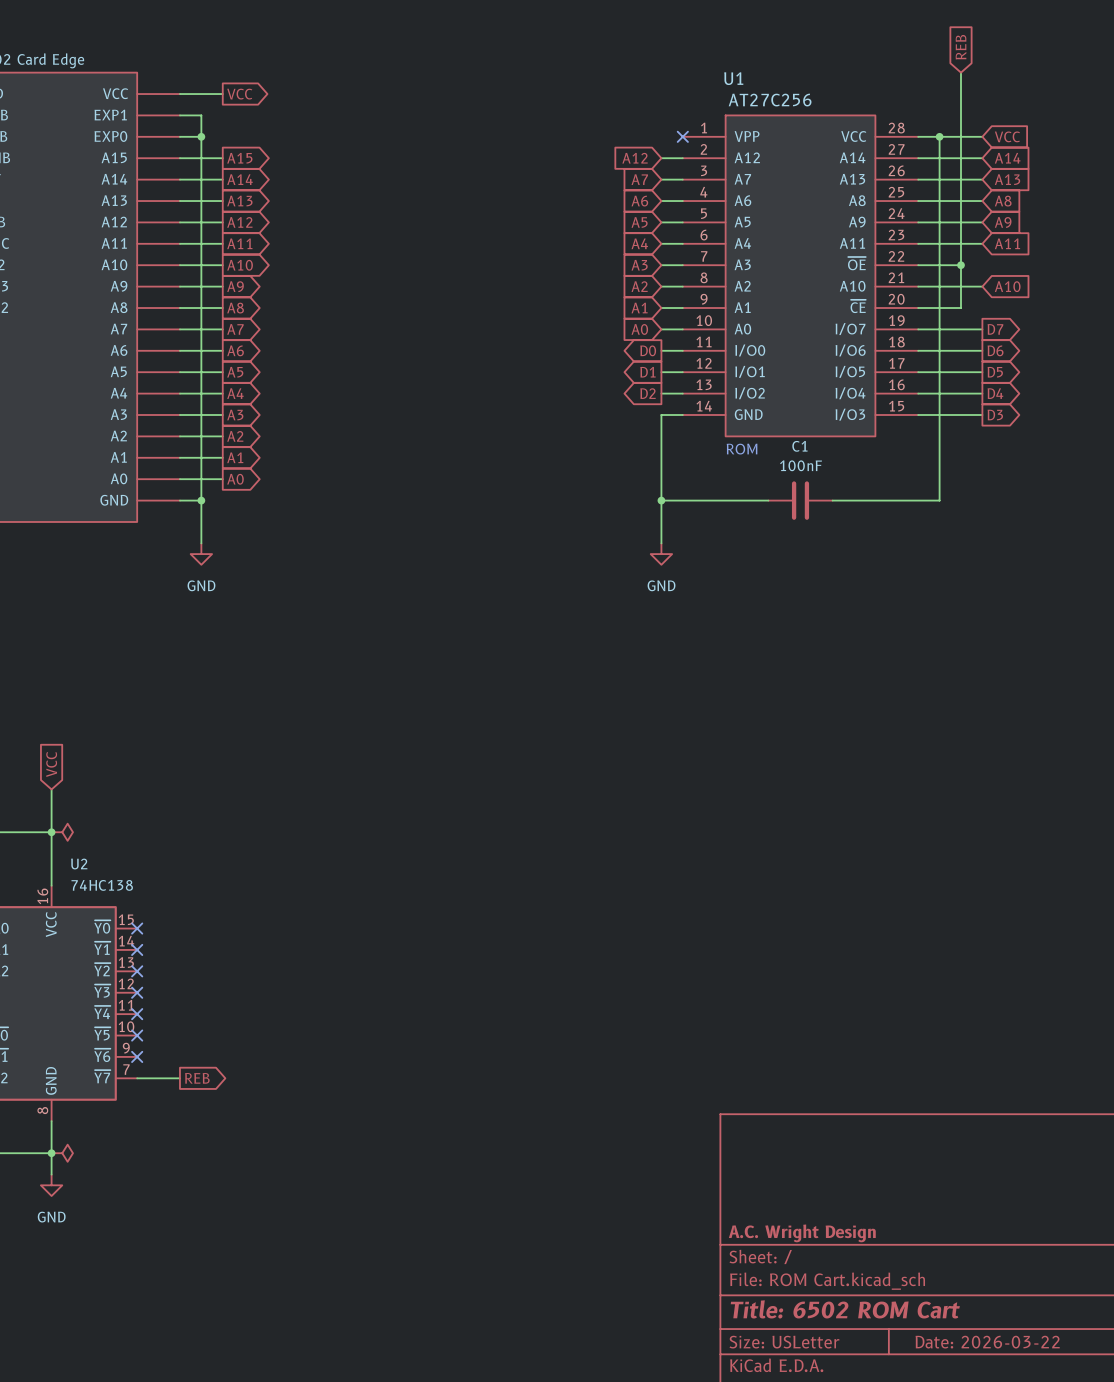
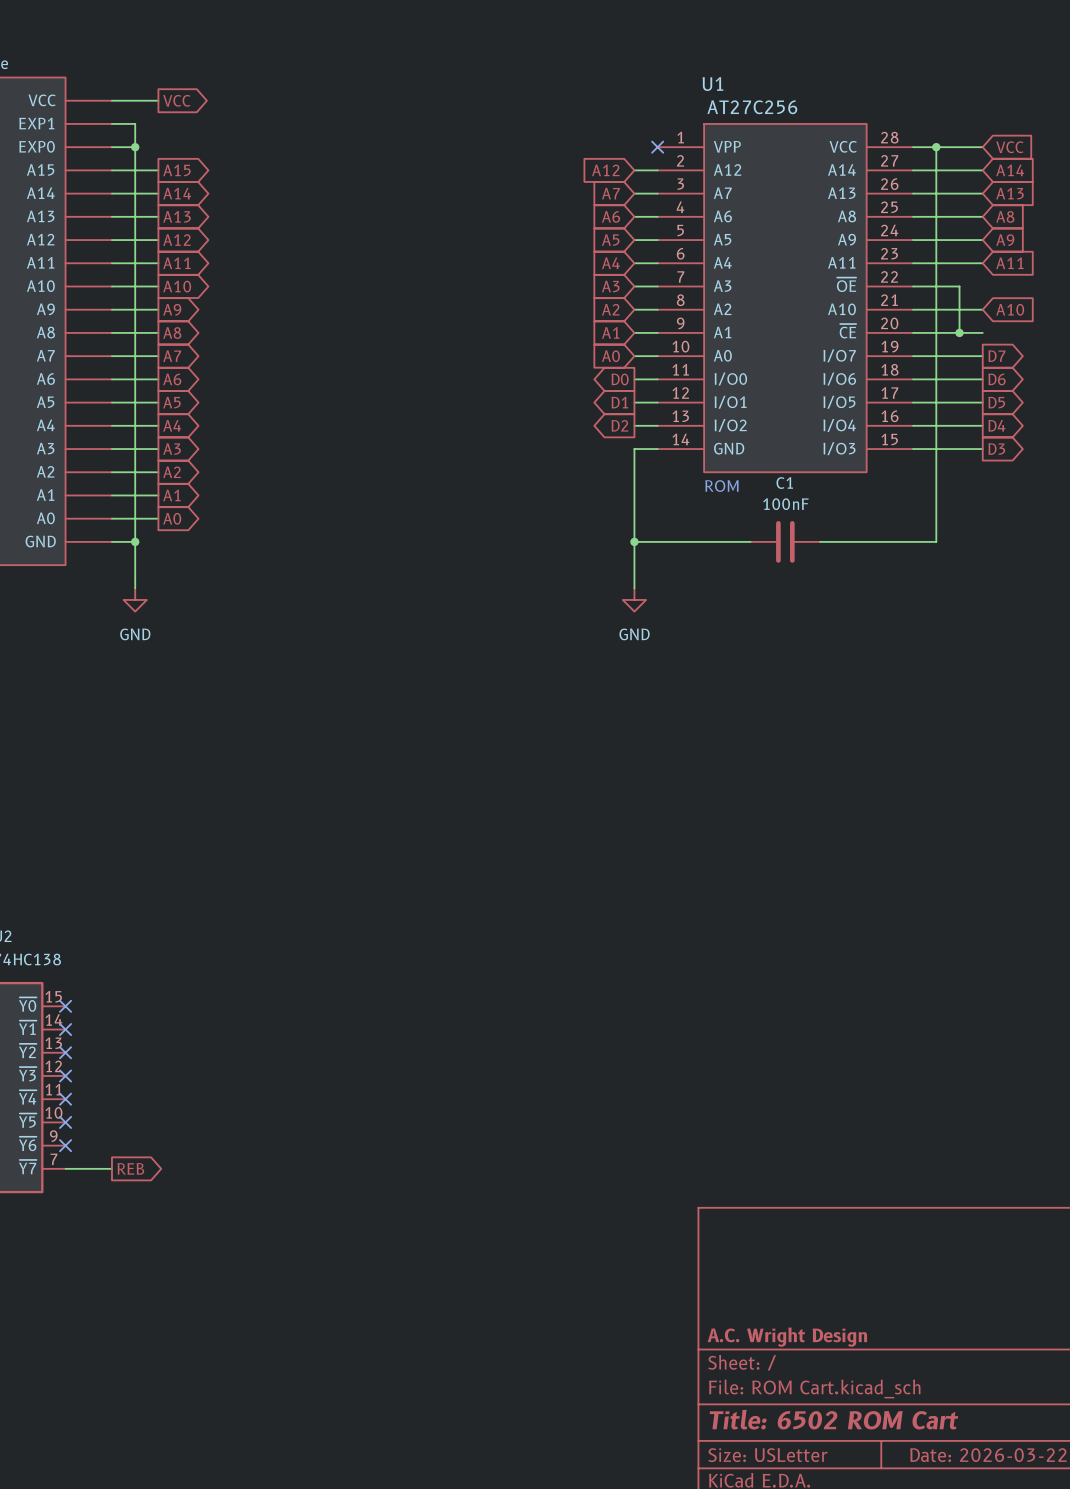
global label: REB (961, 47) -> none
wire: (960, 72) (960, 265) -> none
junction position: (960, 265) -> (959, 332)
wire: none -> (959, 332) (982, 332)

